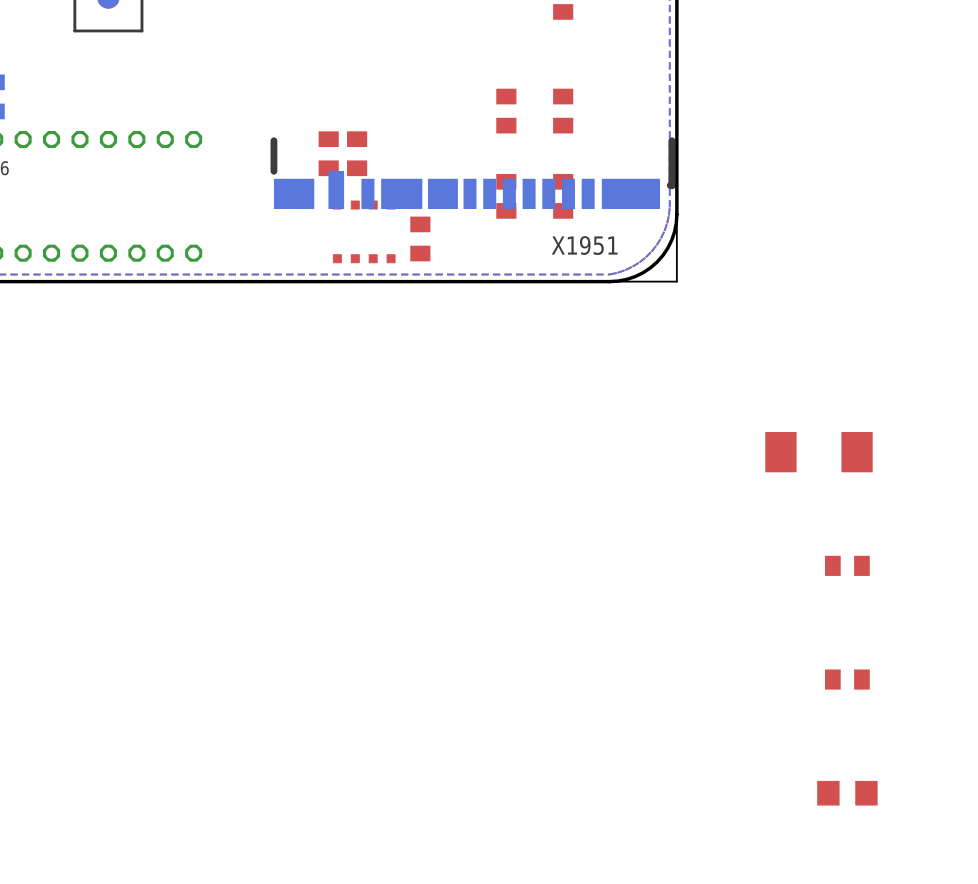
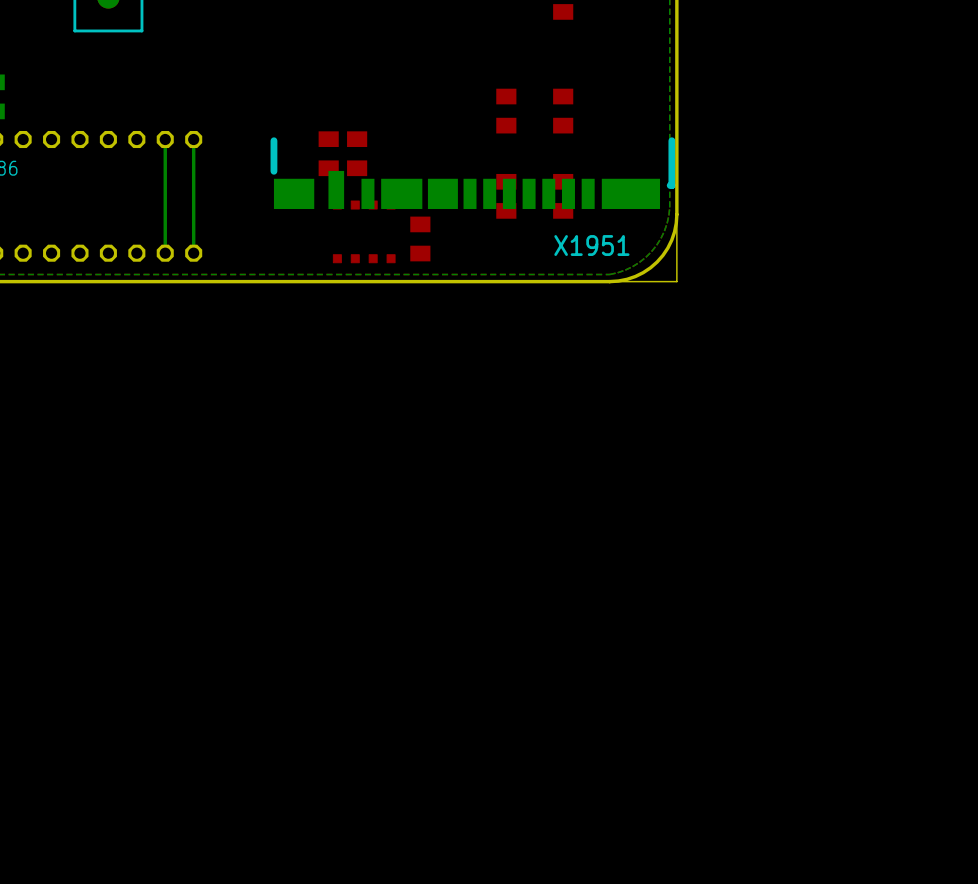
bottom track: none -> (165, 139) (165, 253)
bottom track: none -> (193, 139) (193, 253)
part: (818, 452) -> none
part: (847, 565) -> none
part: (847, 679) -> none
part: (847, 793) -> none

